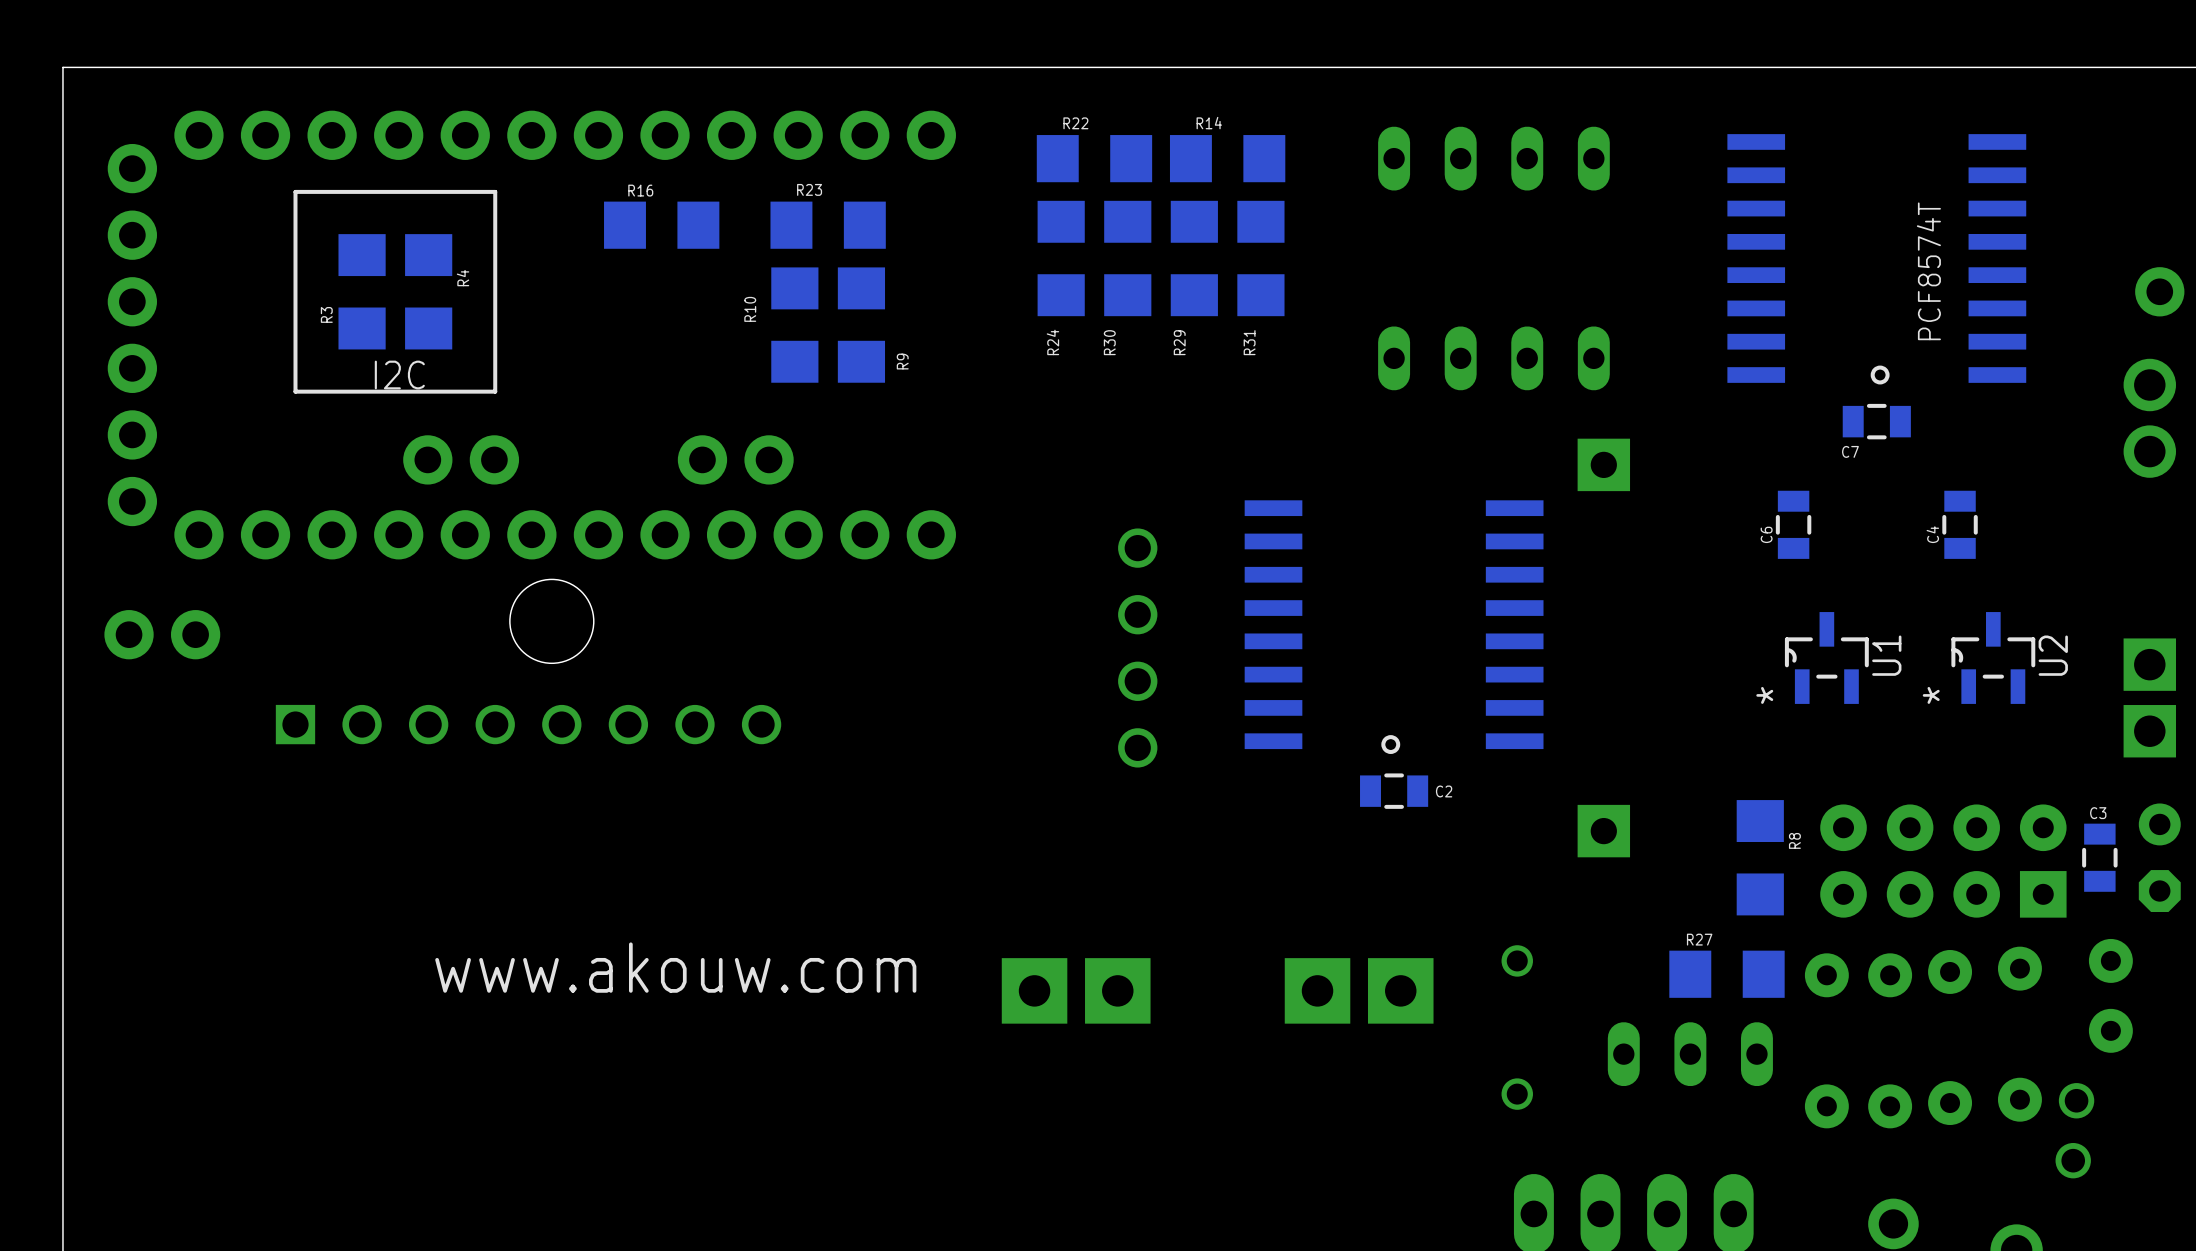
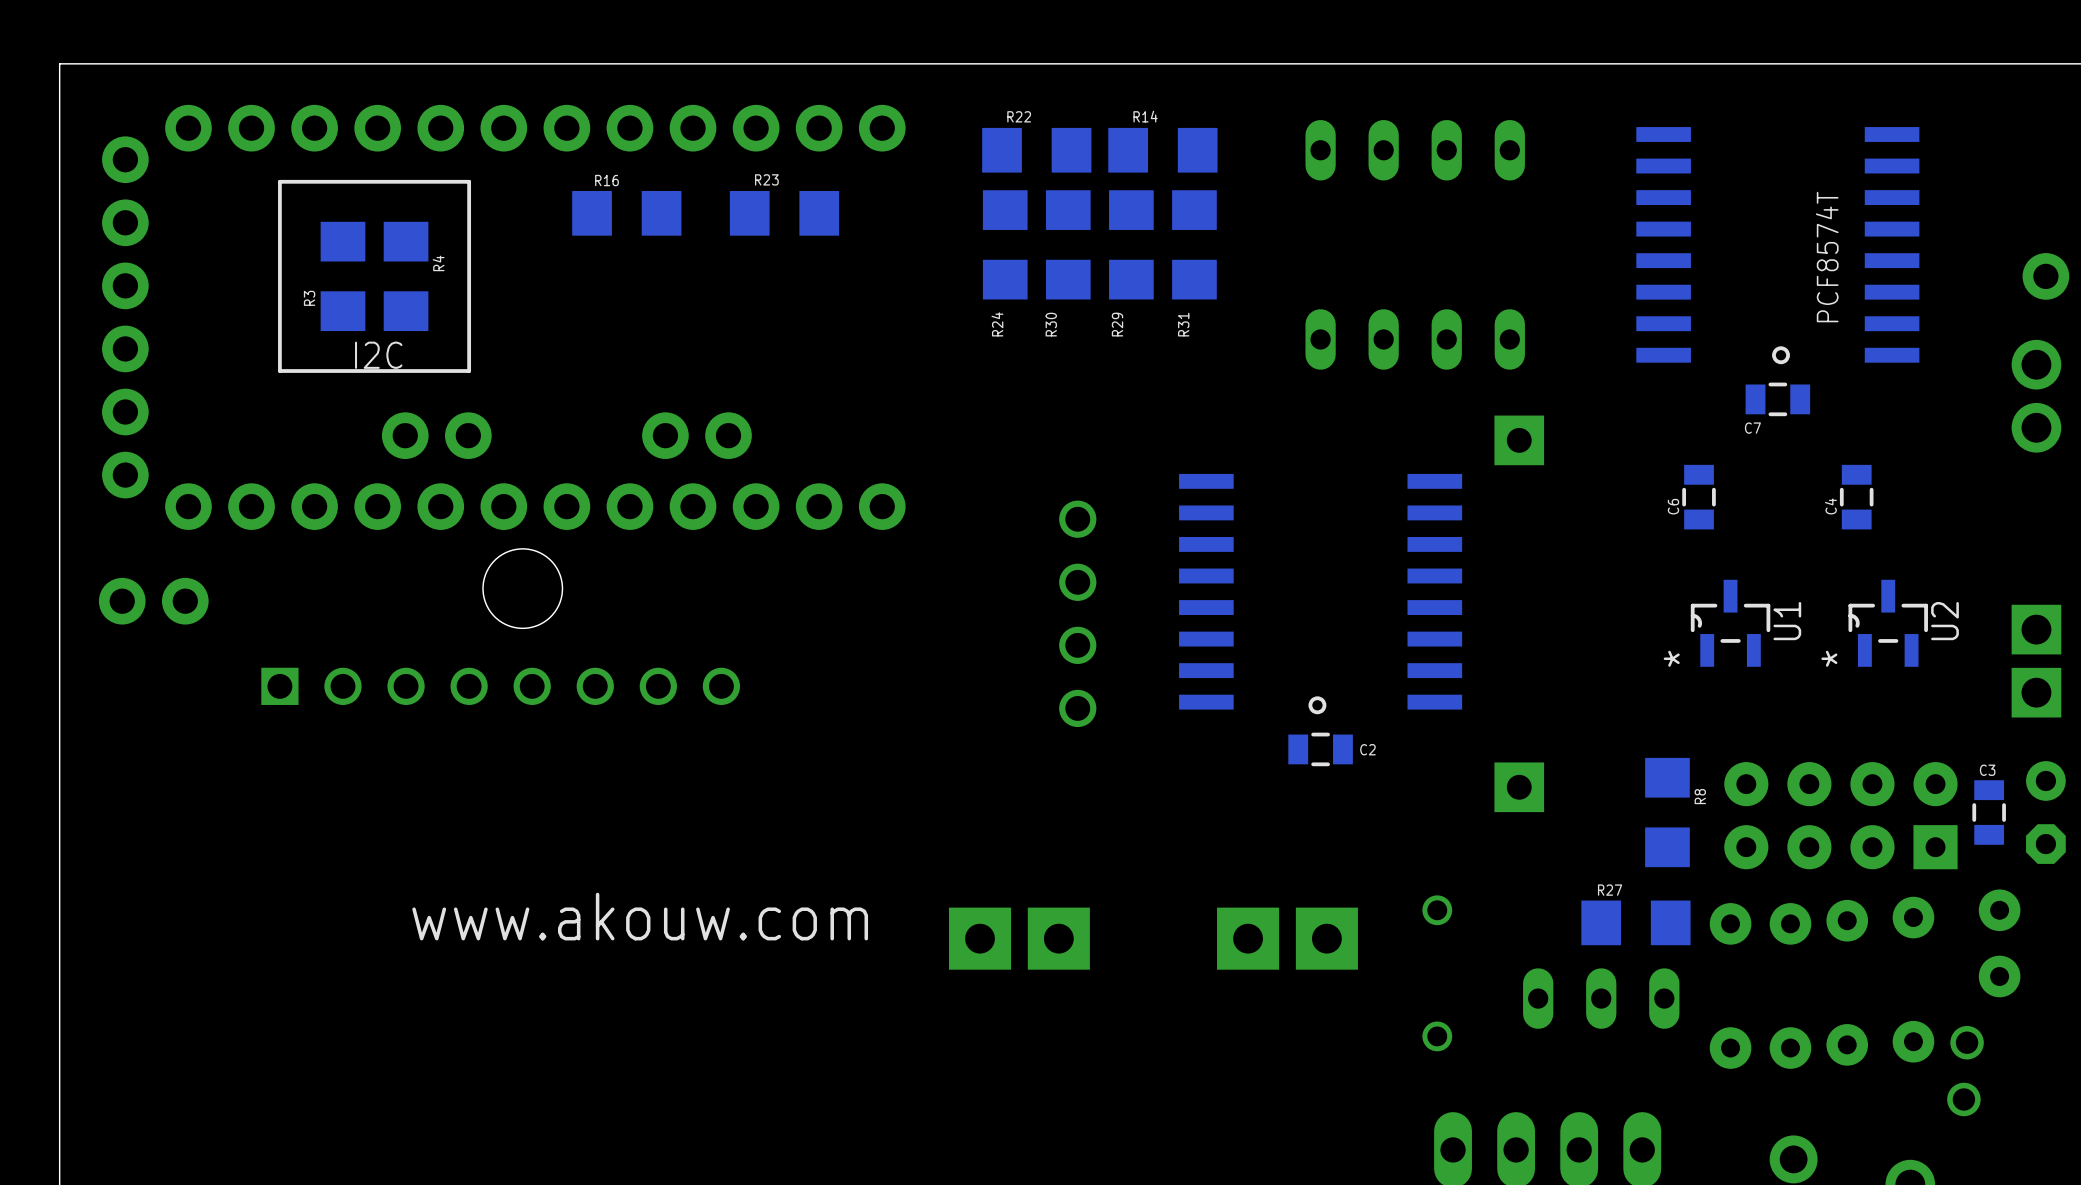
R10: (794, 325) -> none
R9: (861, 325) -> none

